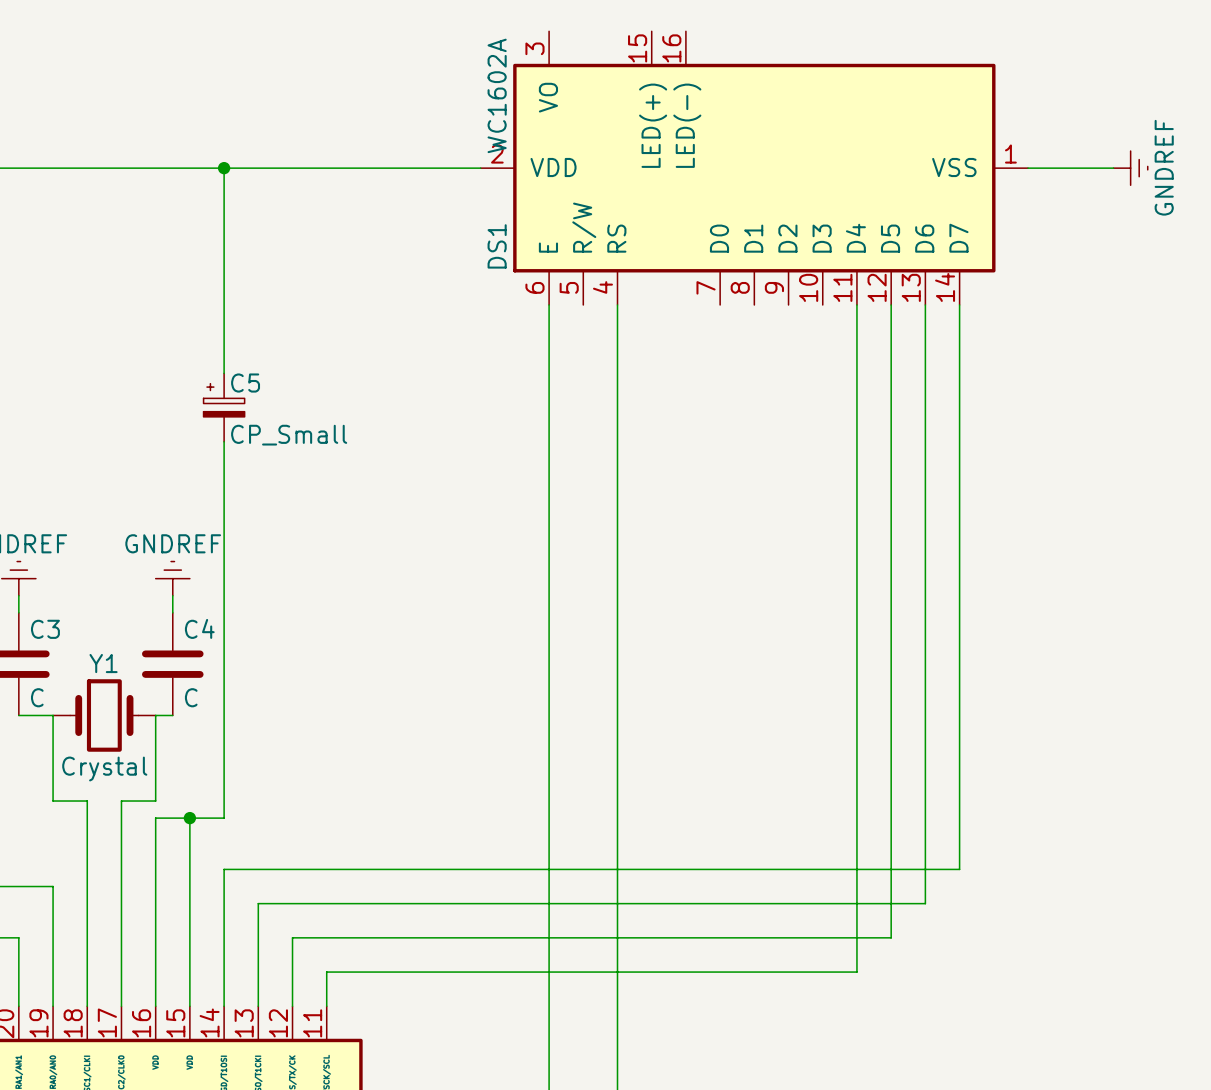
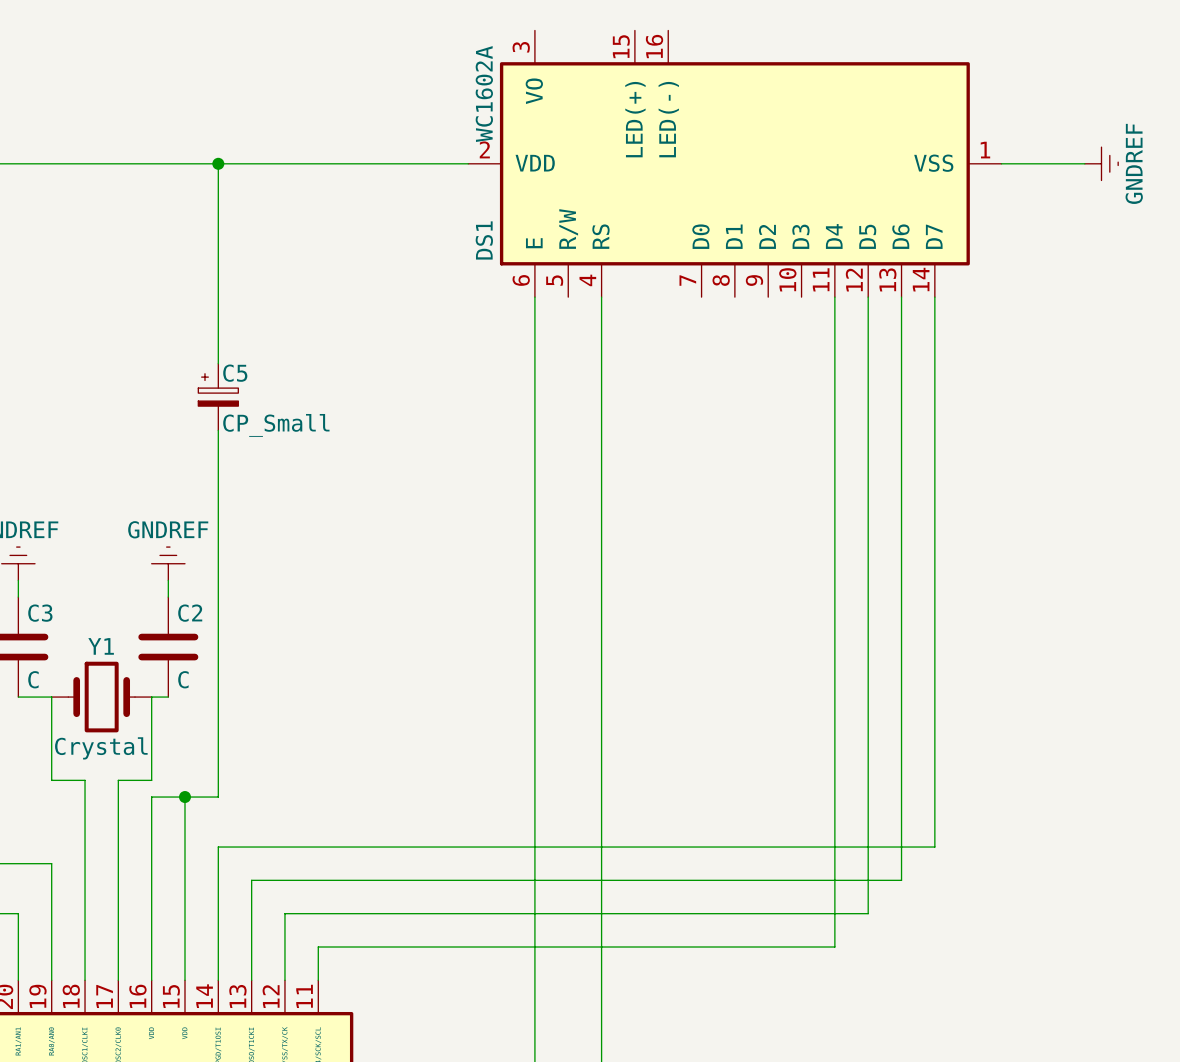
C4 name: C4 (199, 628) -> C2 (190, 613)

